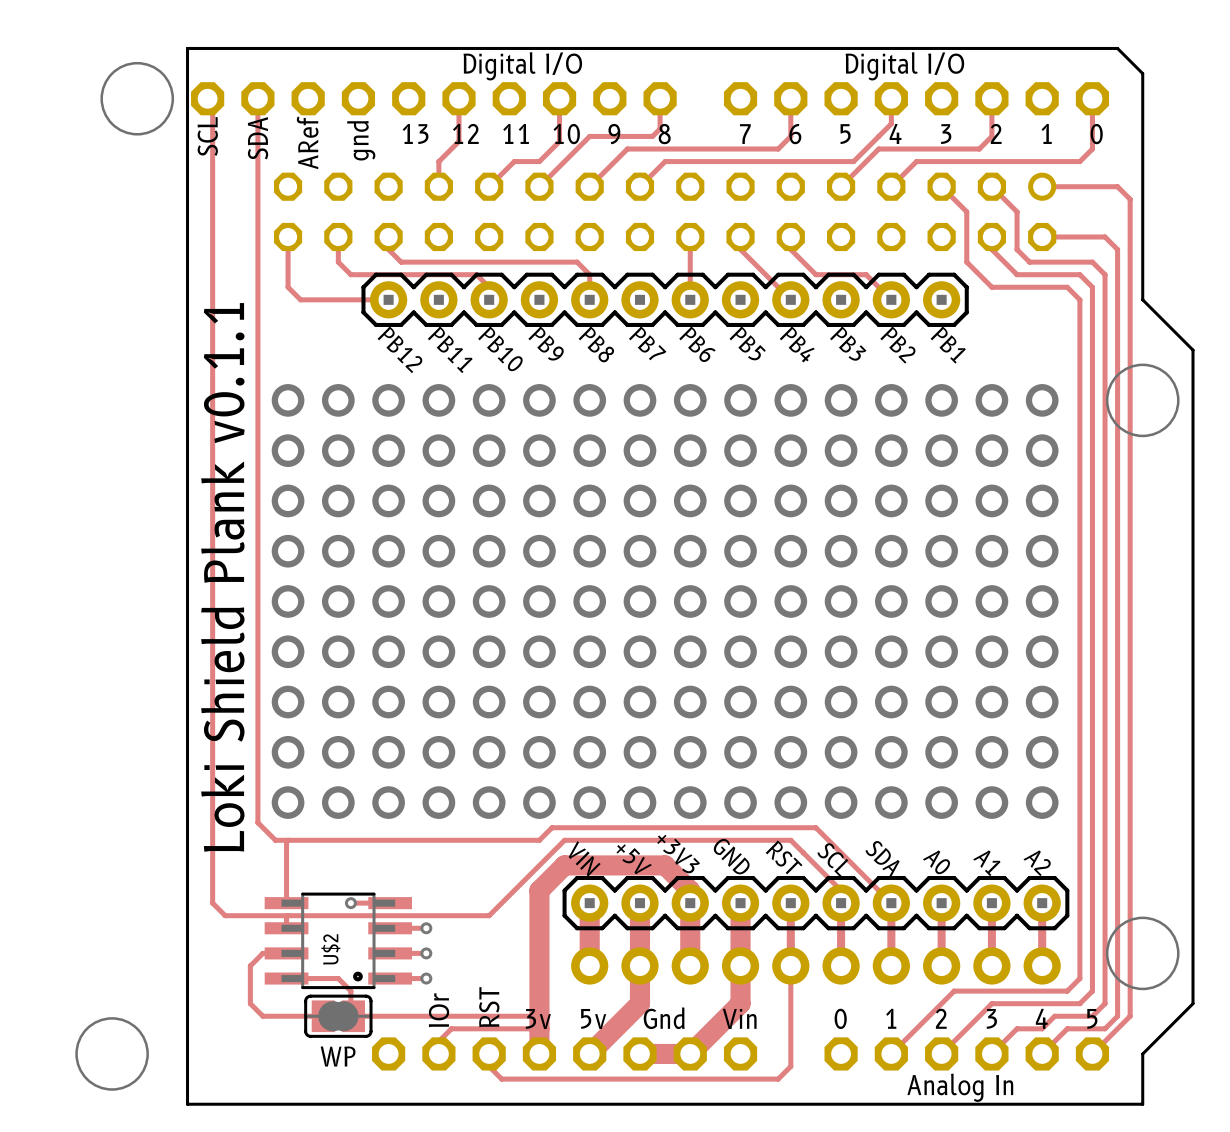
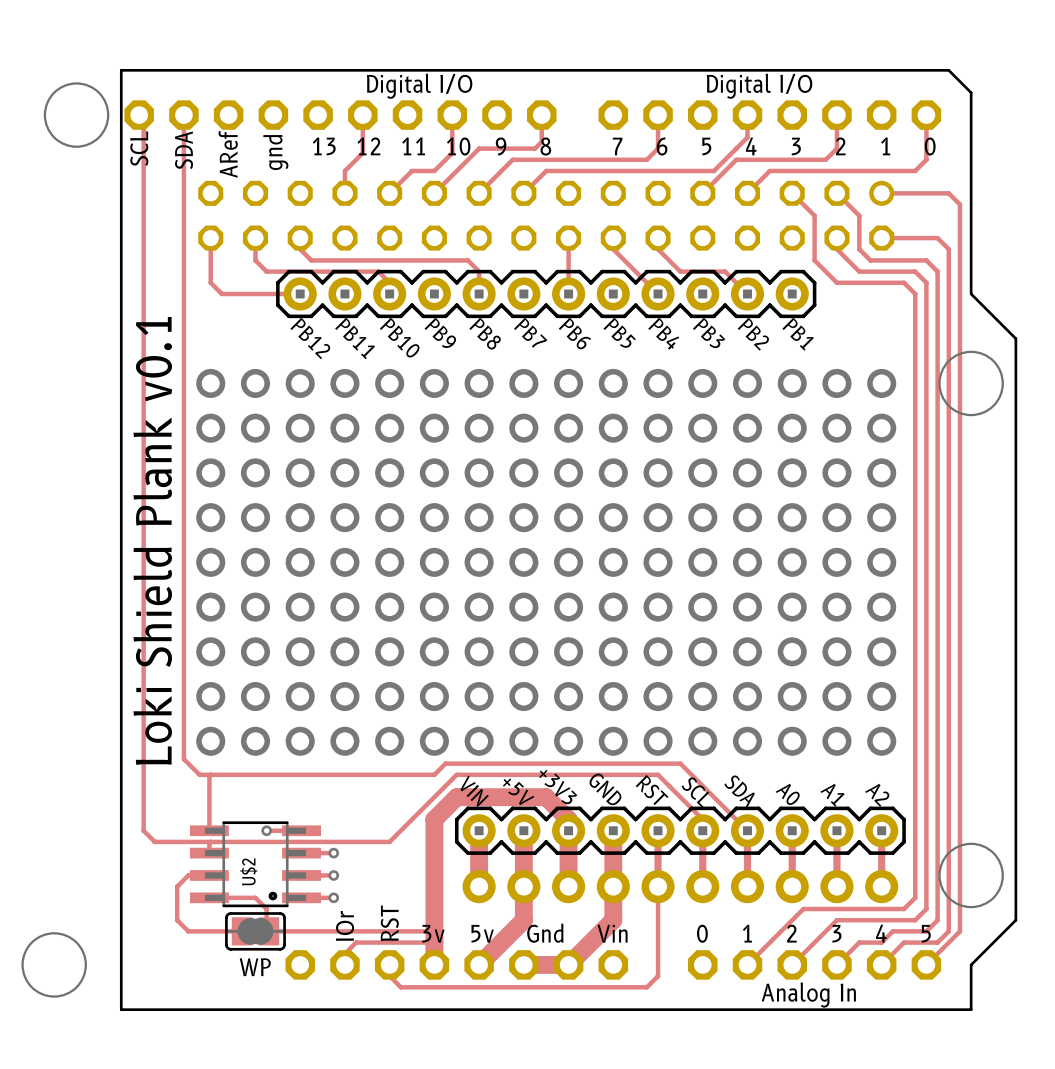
text: Loki Shield Plank v0.1.1 (222, 577) -> Loki Shield Plank v0.1 (152, 540)

